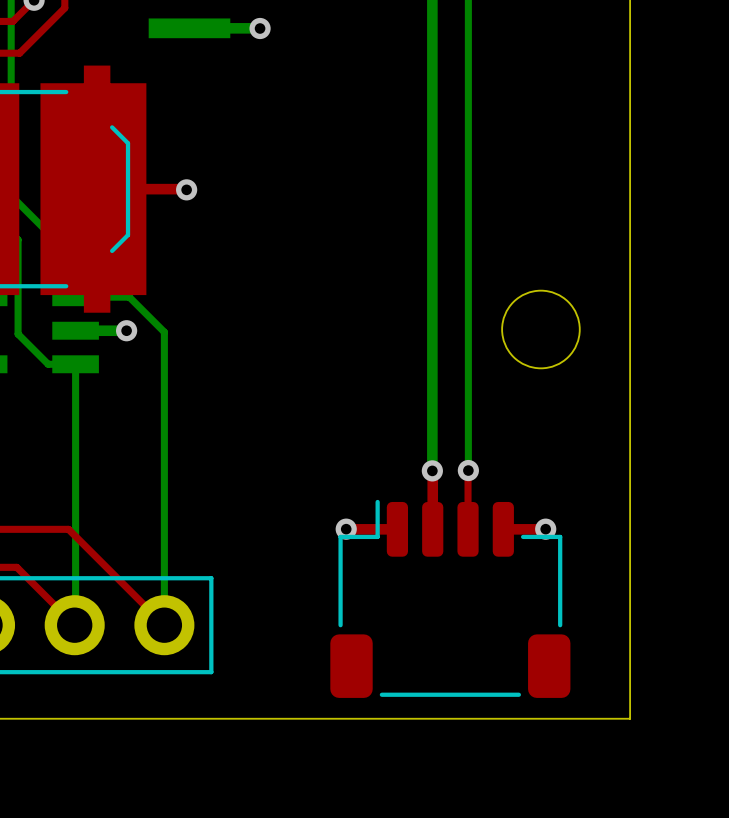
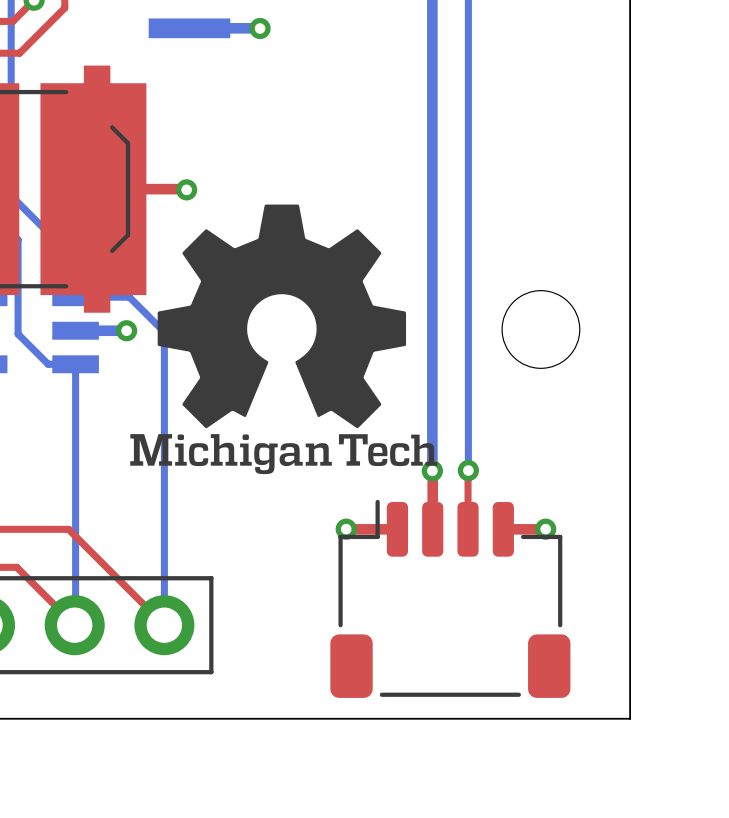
drawing: none -> [130, 204, 438, 475]

